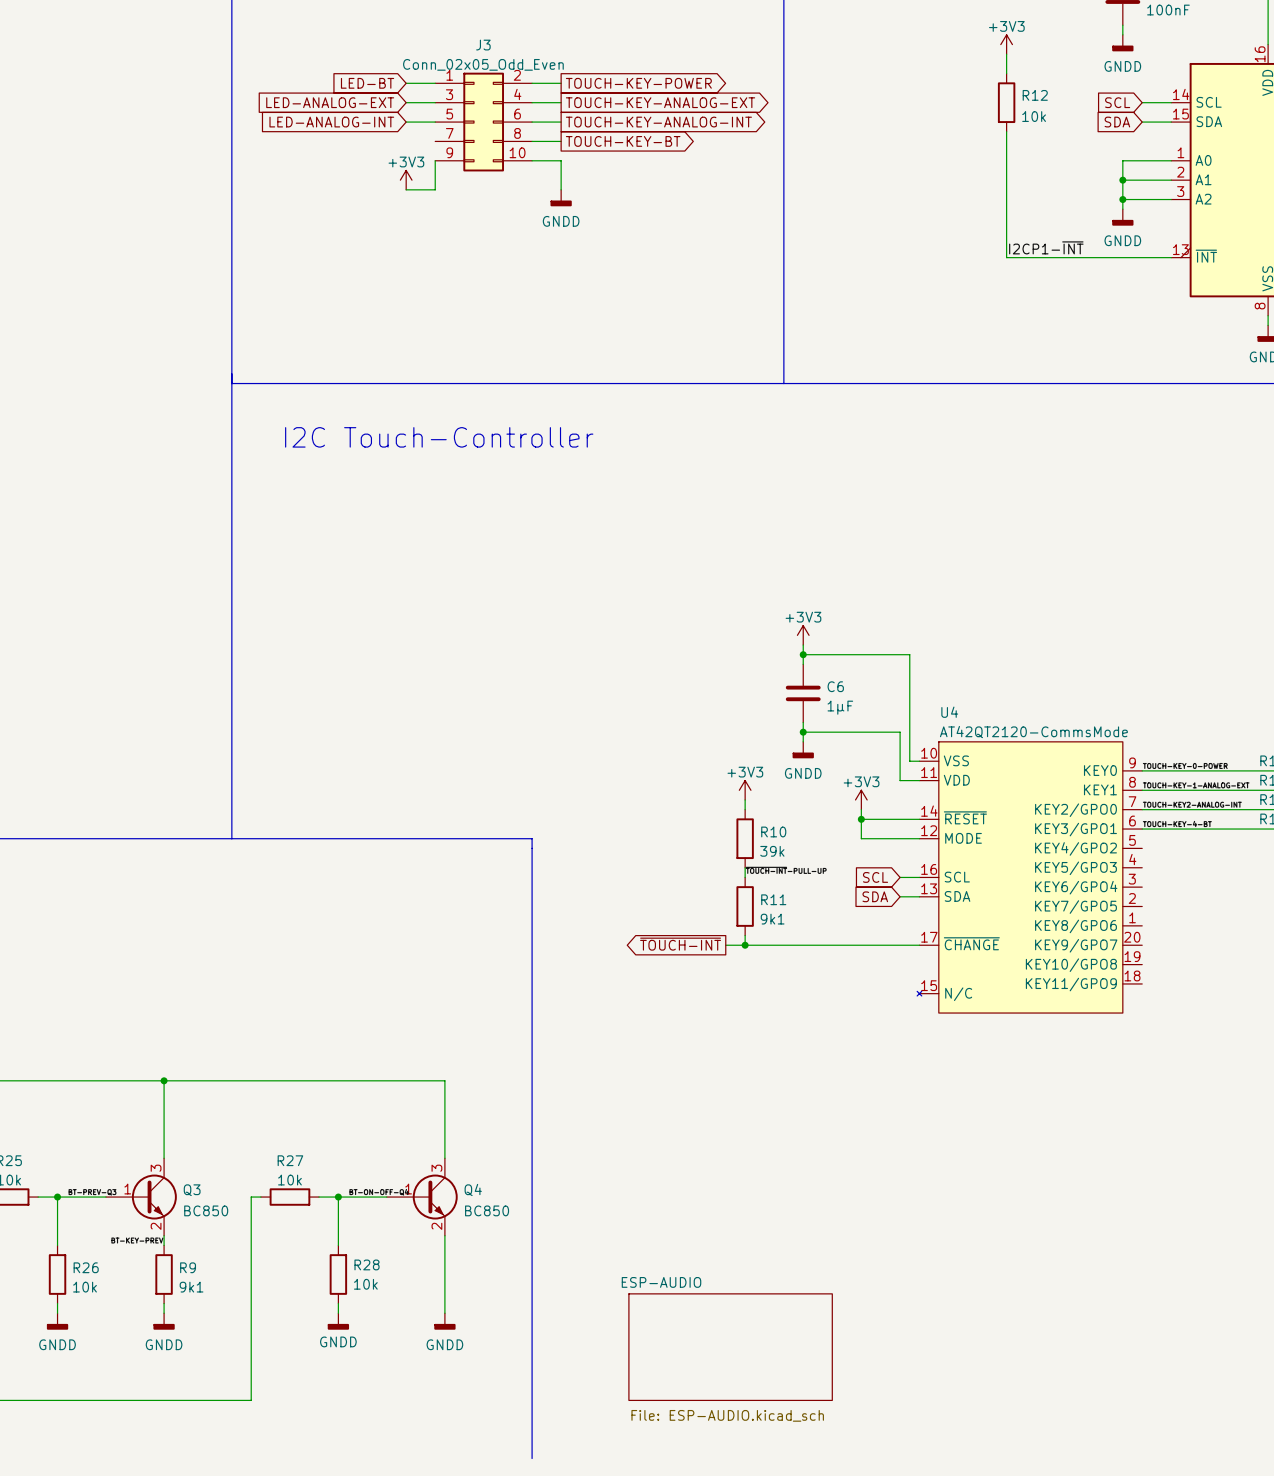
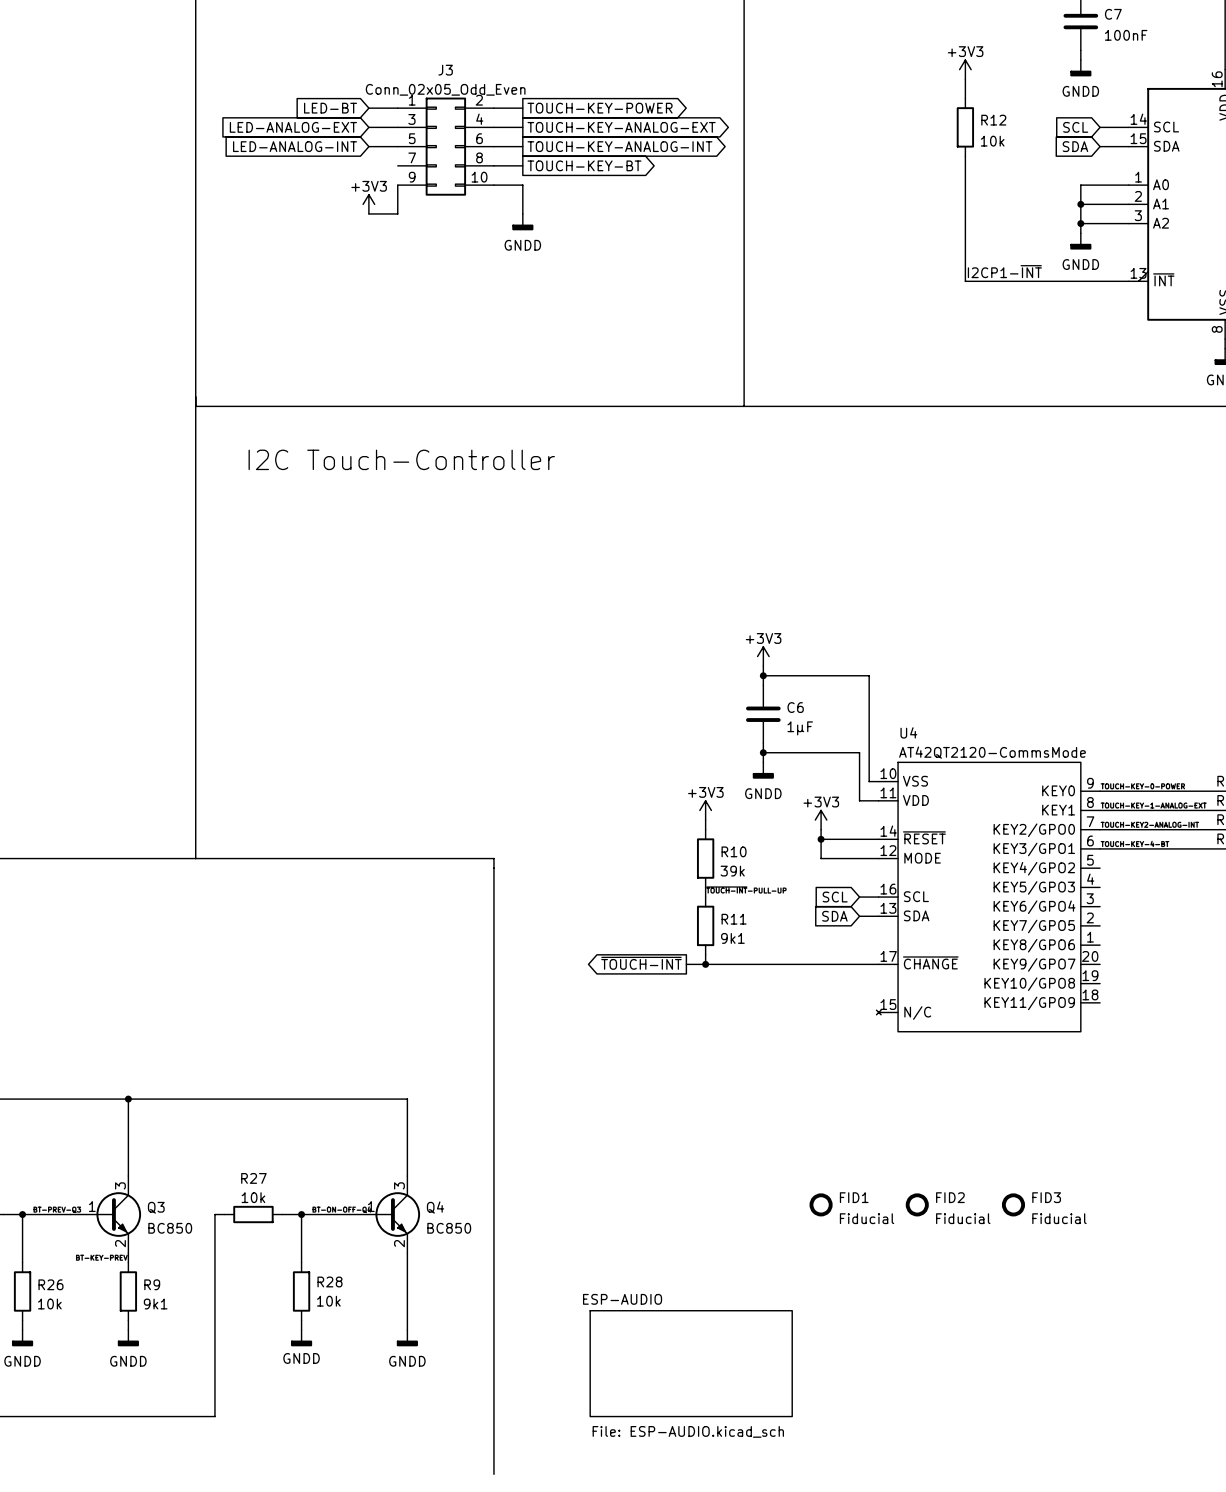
FID1: none -> Fiducial (821, 1204)
FID2: none -> Fiducial (917, 1204)
FID3: none -> Fiducial (1013, 1204)

